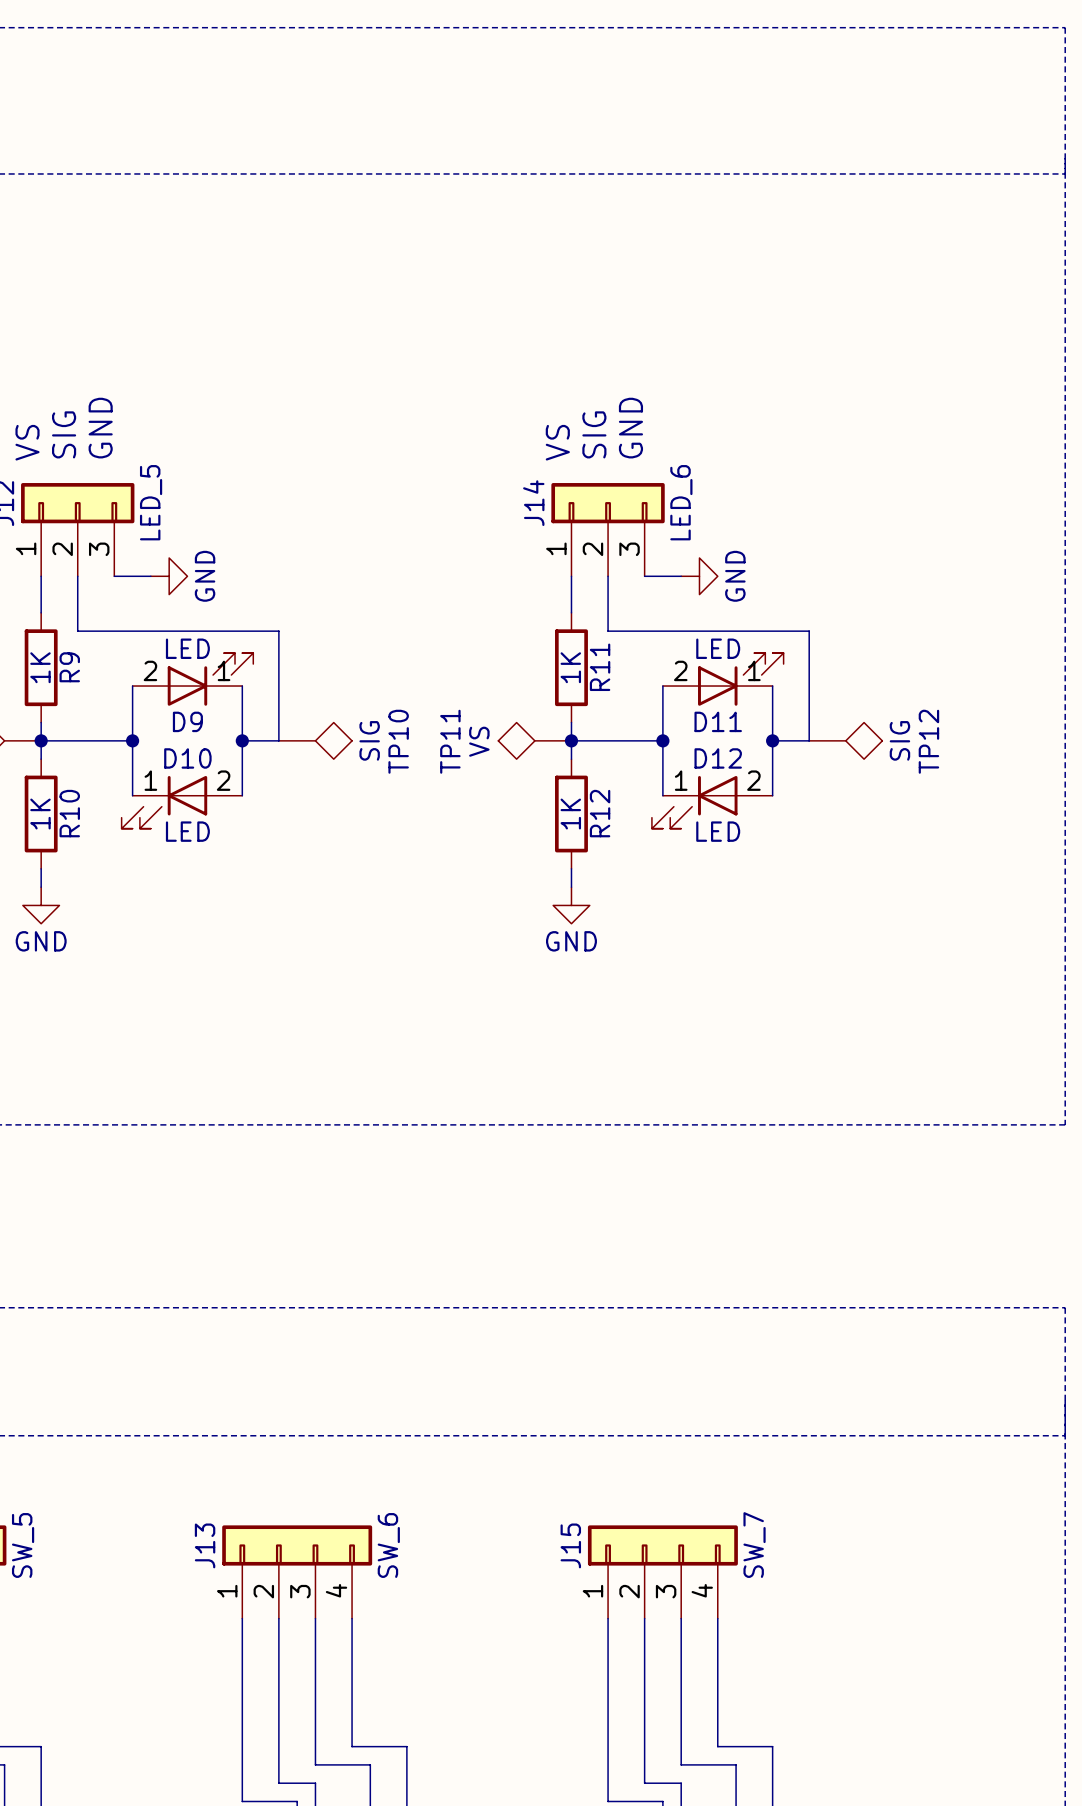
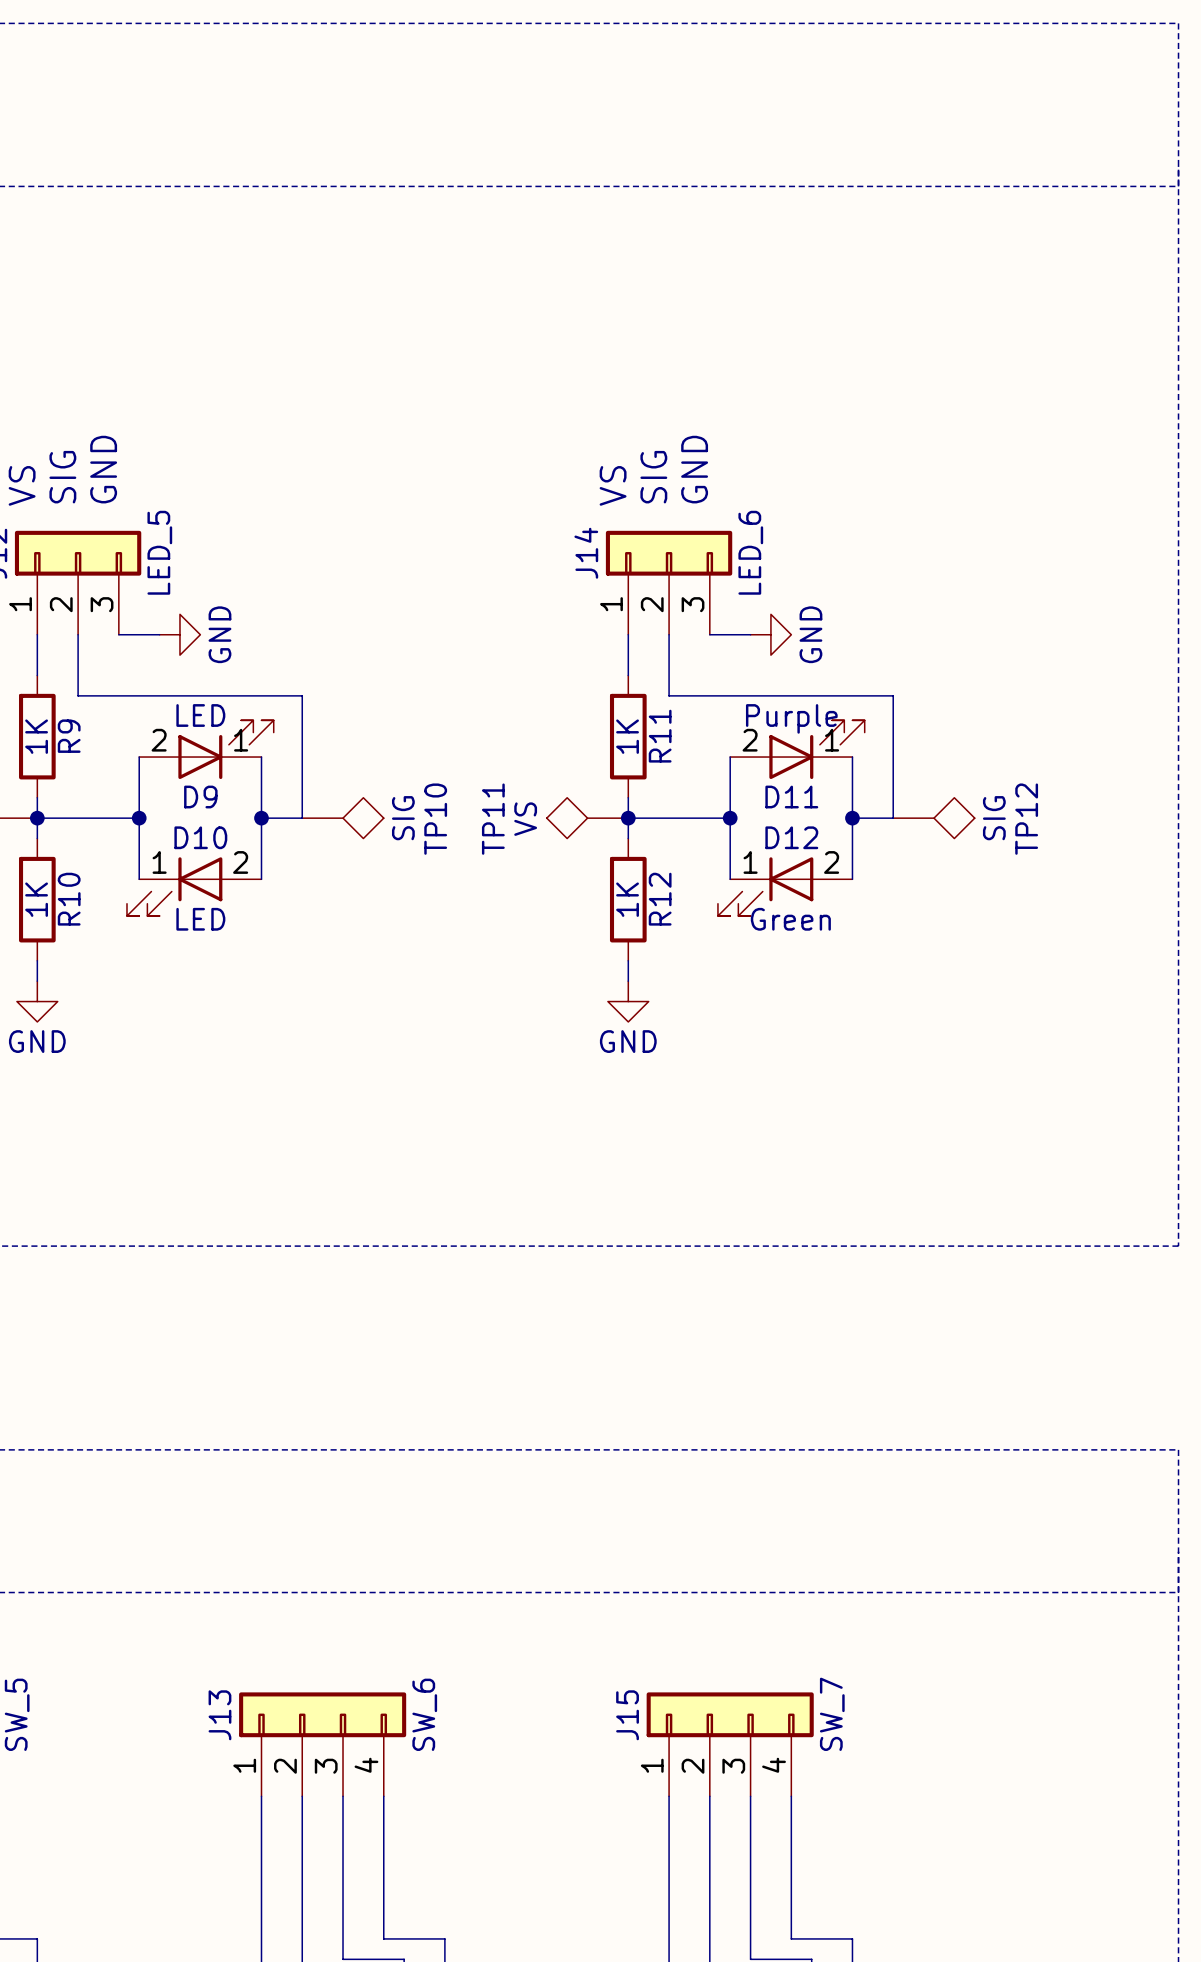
D11 value: LED (718, 648) -> Purple (791, 718)
D12 value: LED (718, 831) -> Green (790, 919)

